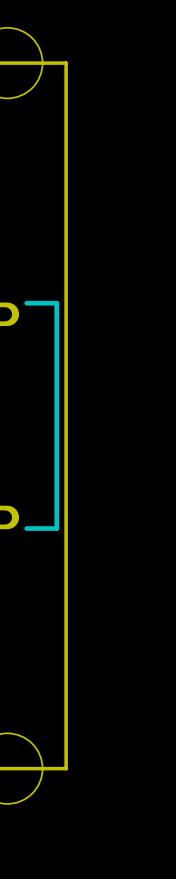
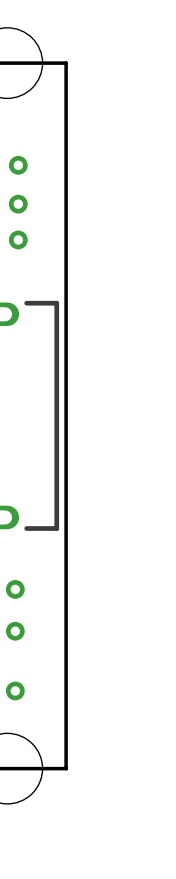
via: none -> (18, 165)
via: none -> (18, 204)
via: none -> (18, 239)
via: none -> (15, 589)
via: none -> (15, 631)
via: none -> (15, 690)

